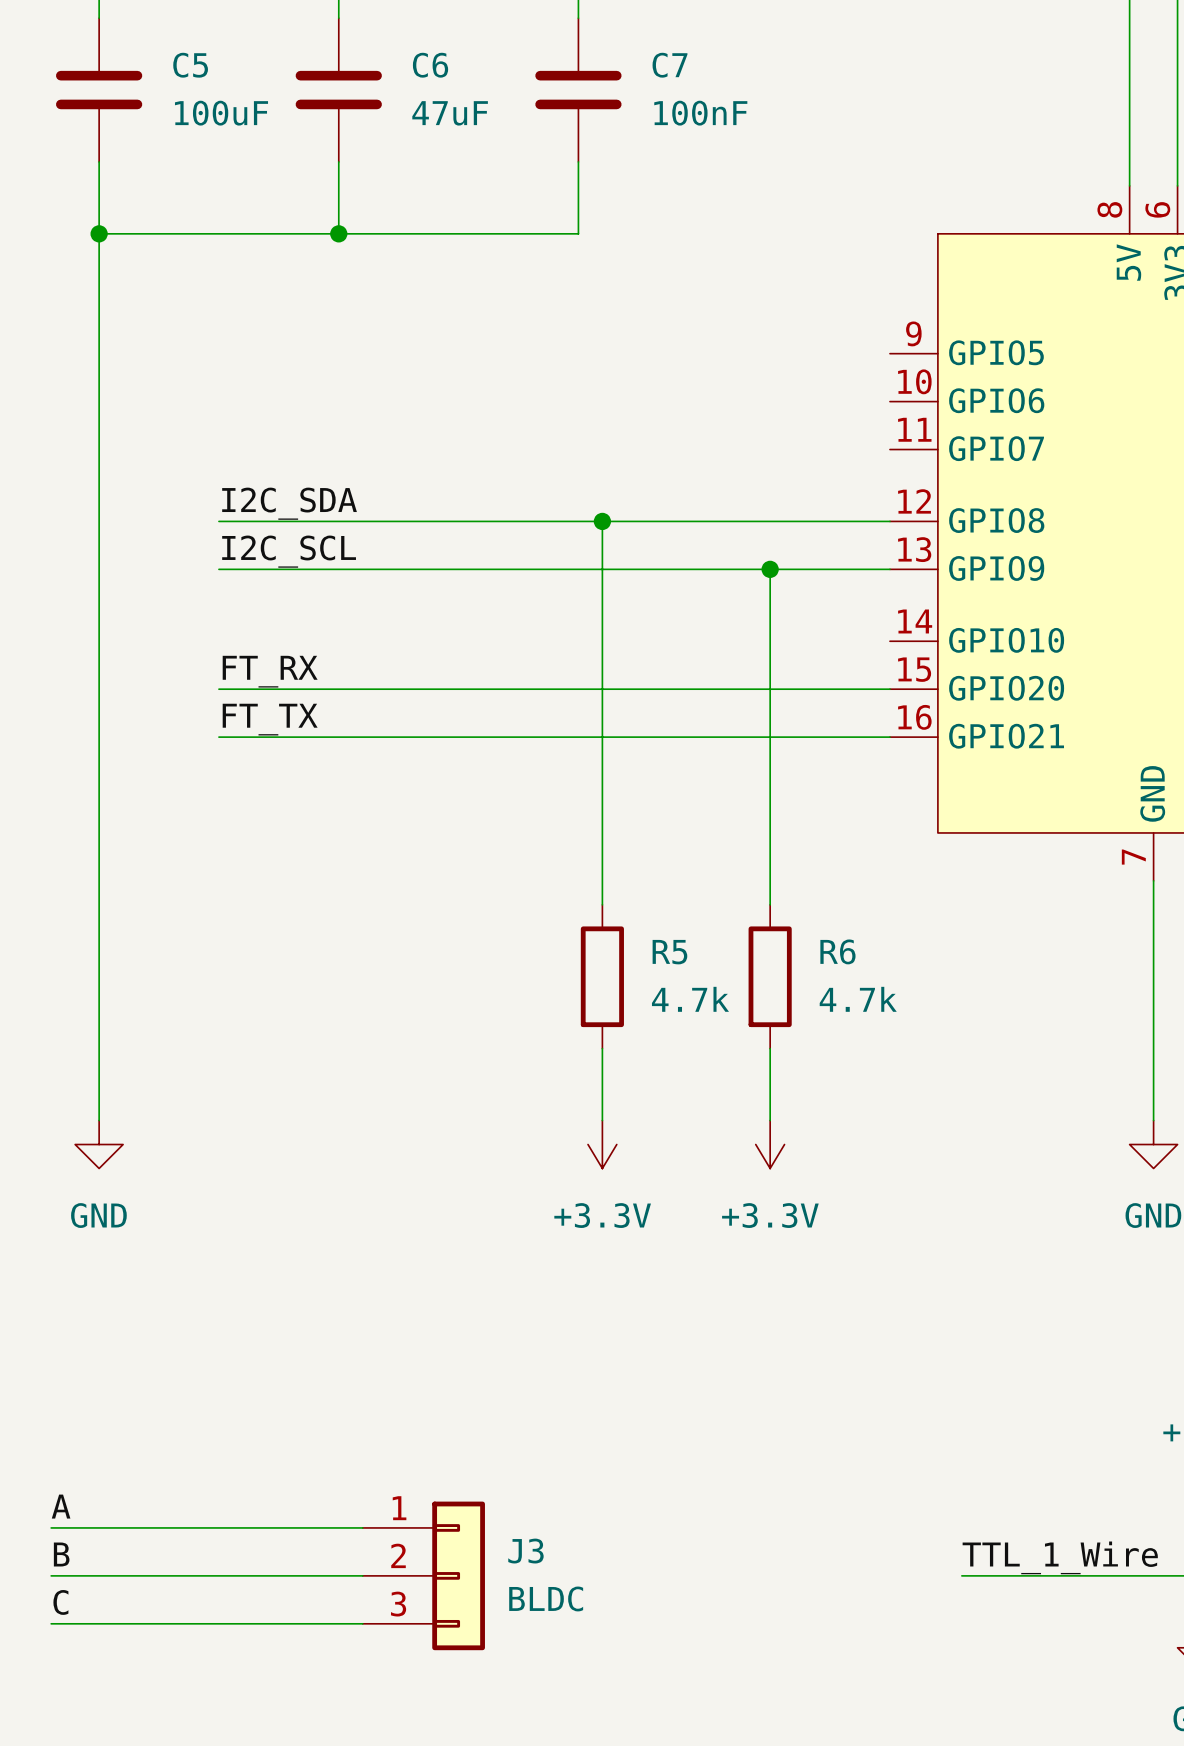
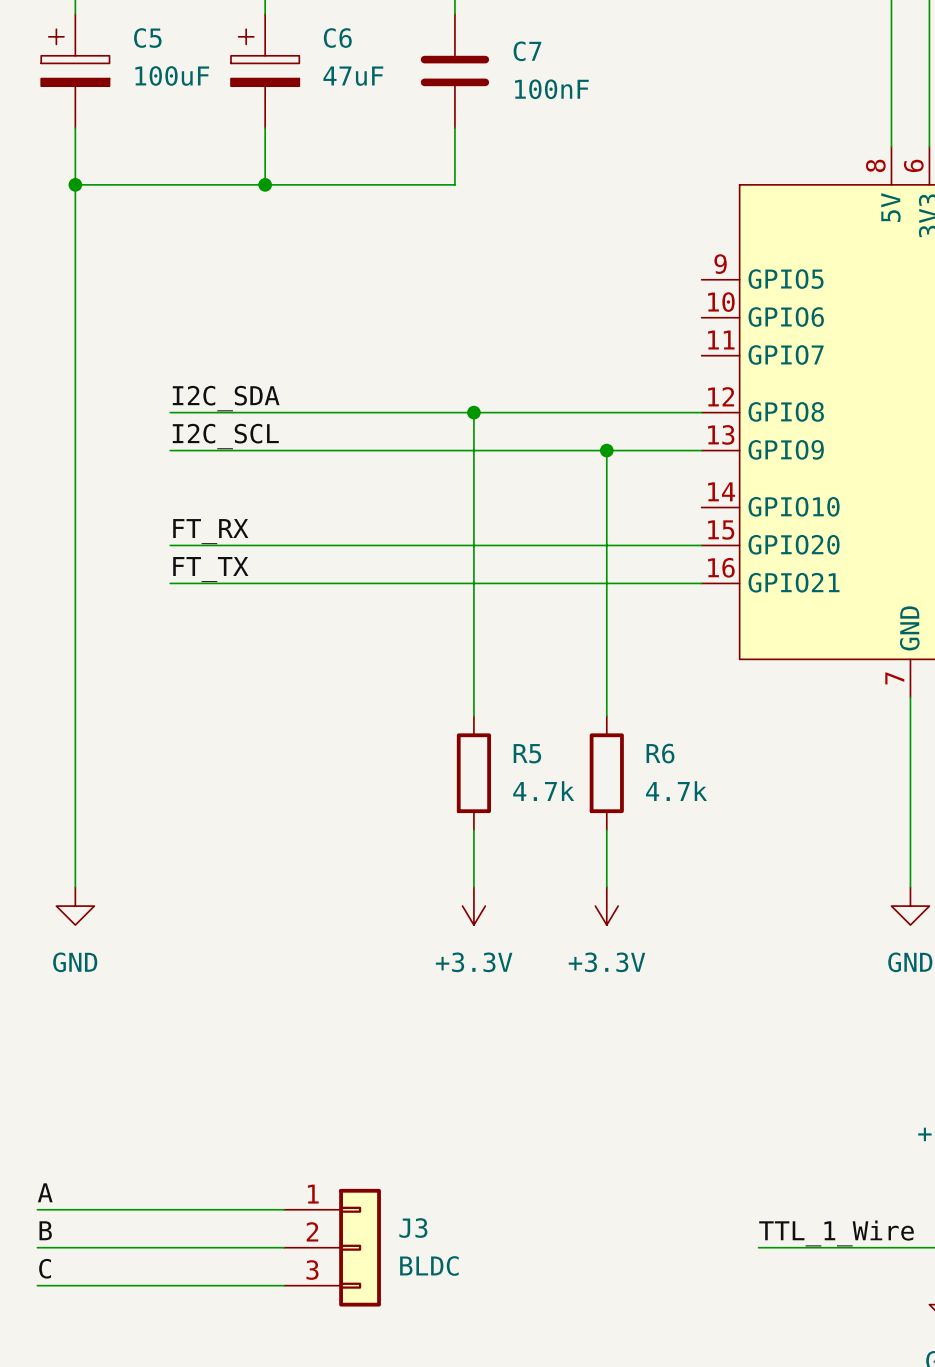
C5 symbol: [55, 18, 143, 162] -> [41, 14, 110, 128]
C6 symbol: [295, 18, 382, 162] -> [230, 14, 300, 128]

